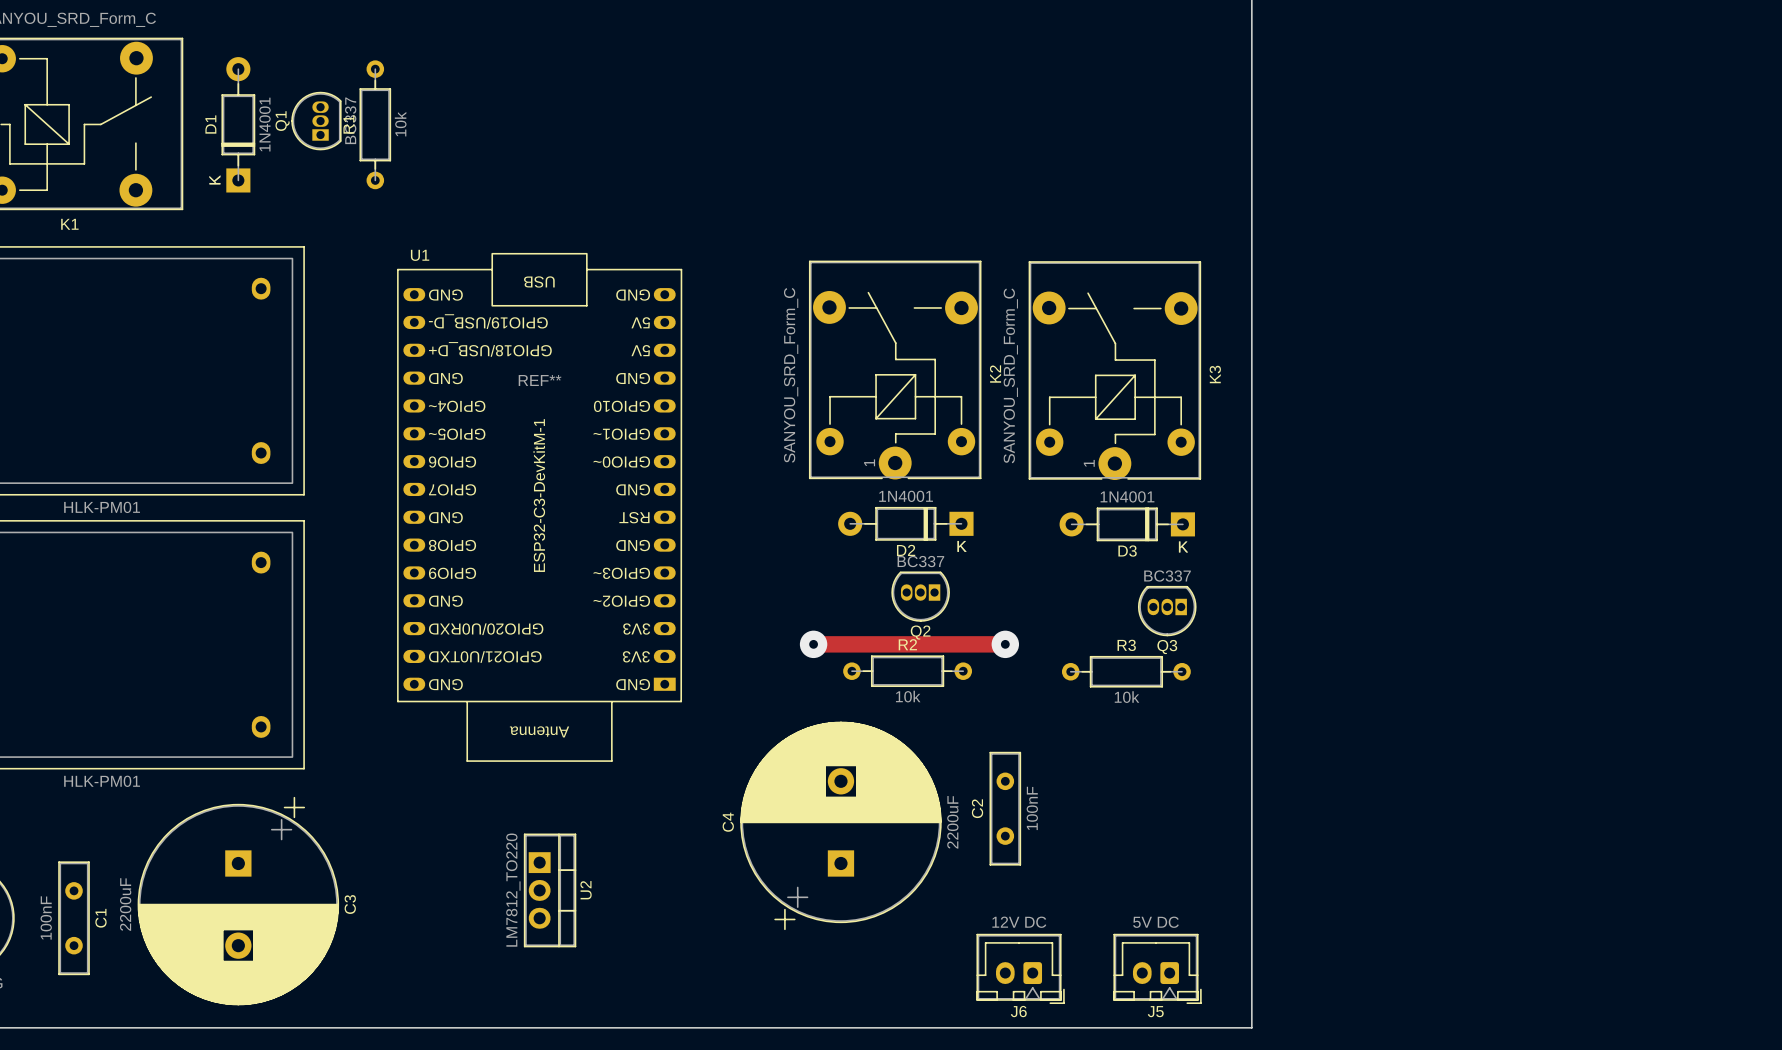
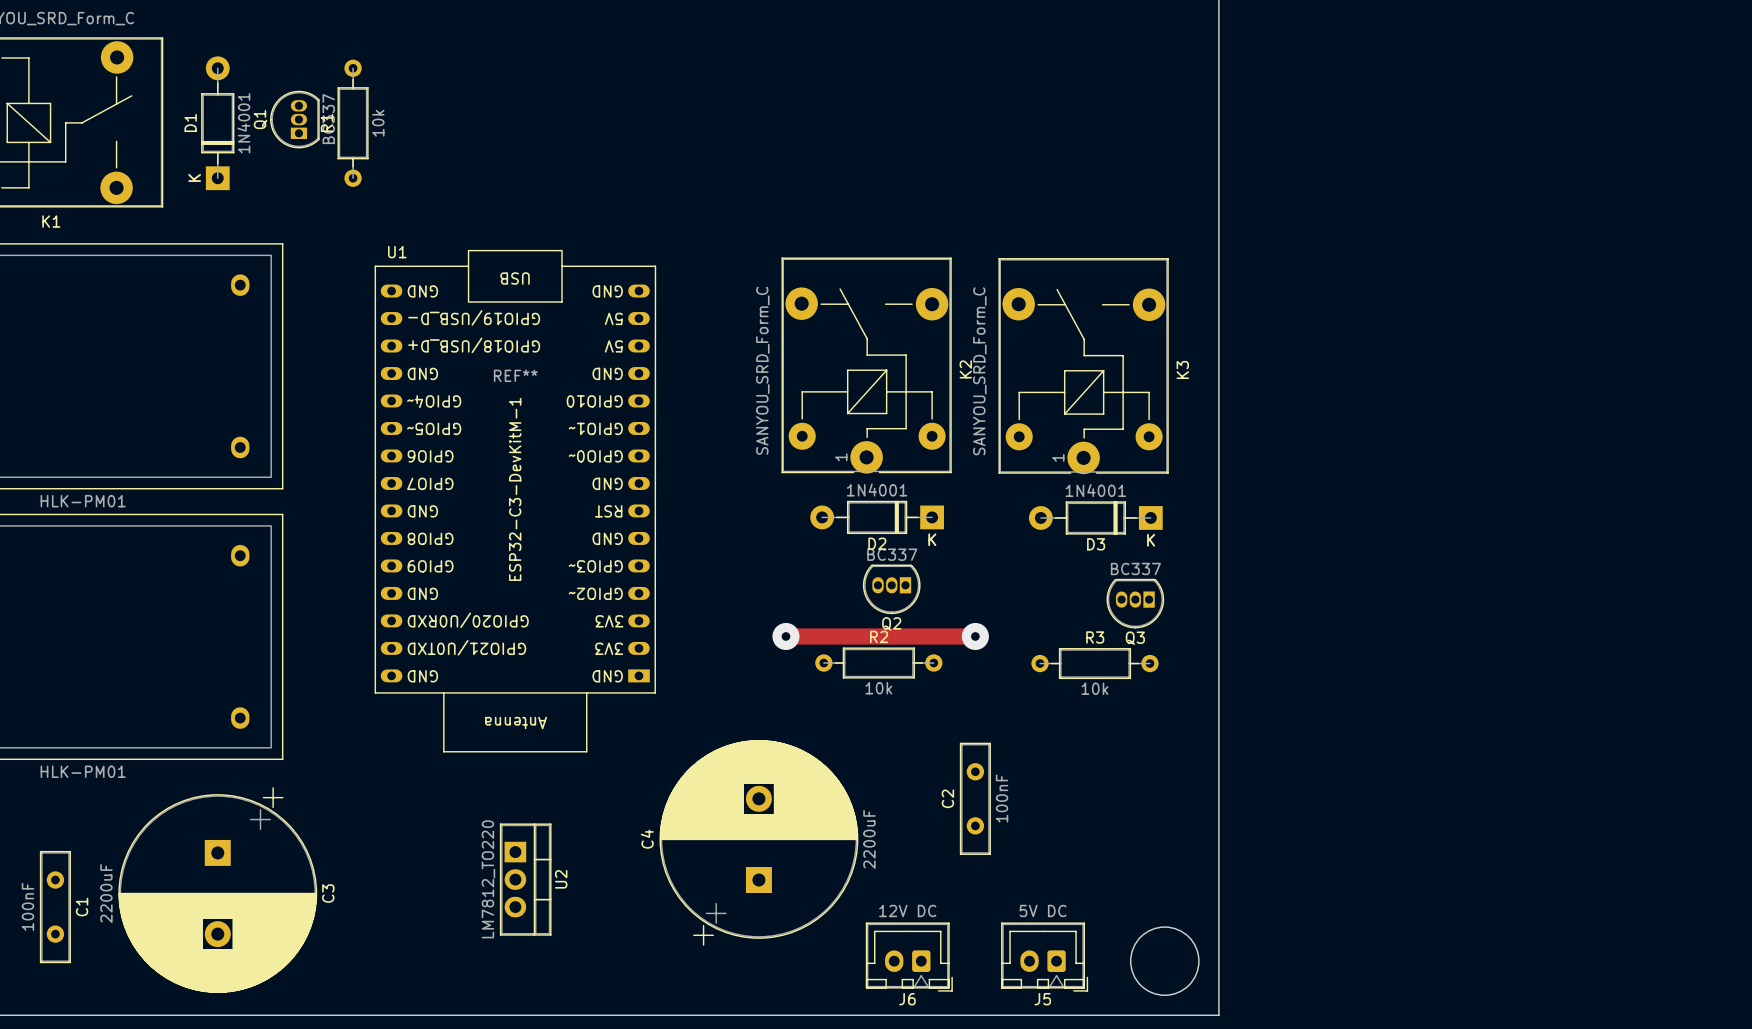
C4 position: (840, 825) -> (758, 842)
round board edge: none -> [1130, 926, 1200, 996]
J6 position: (1020, 968) -> (909, 957)
J5 position: (1157, 968) -> (1044, 957)

